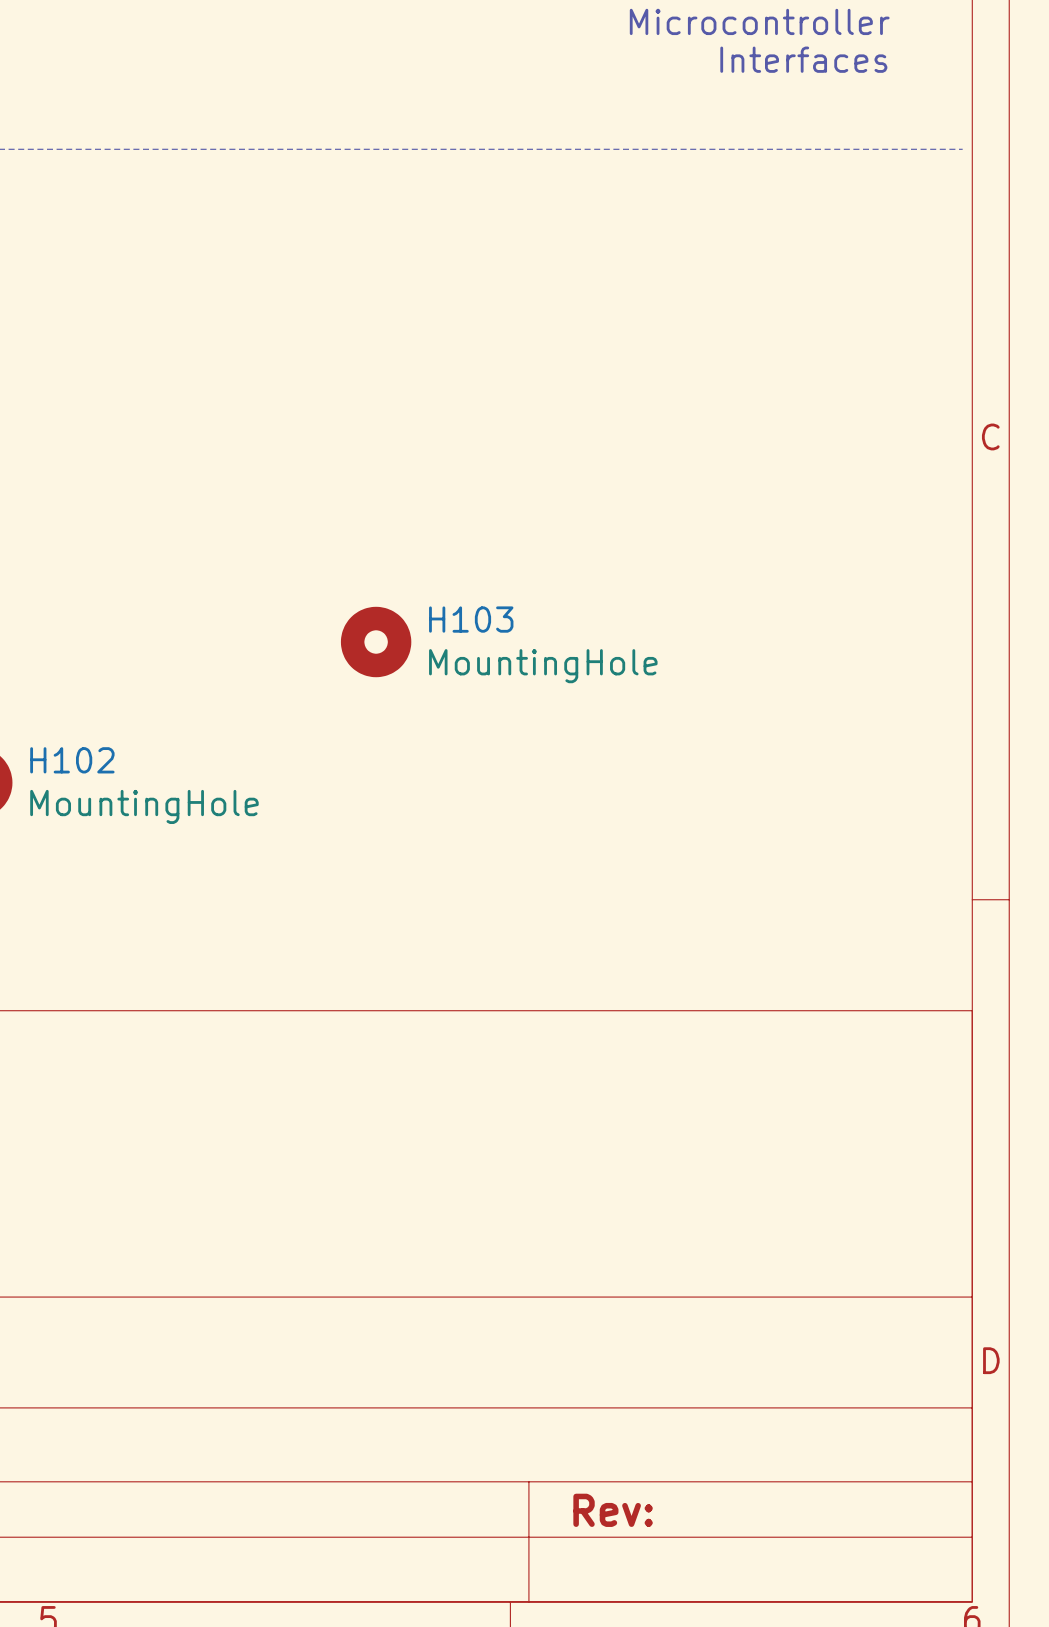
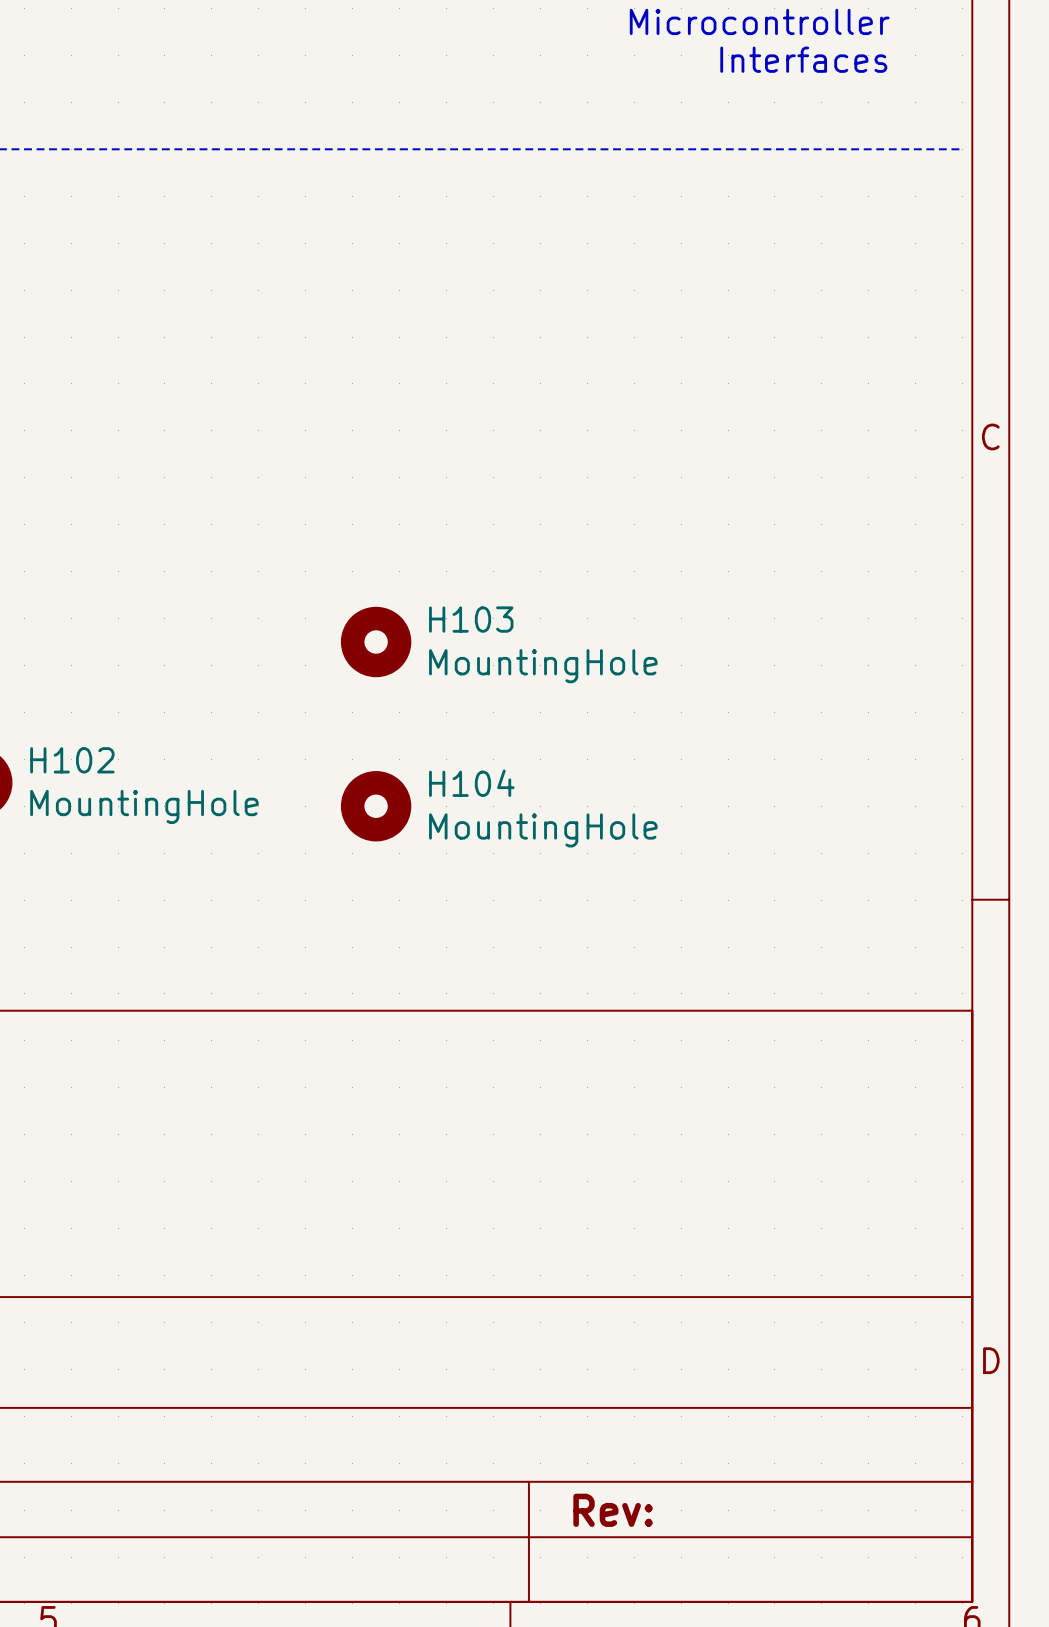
H104: none -> MountingHole (376, 806)

